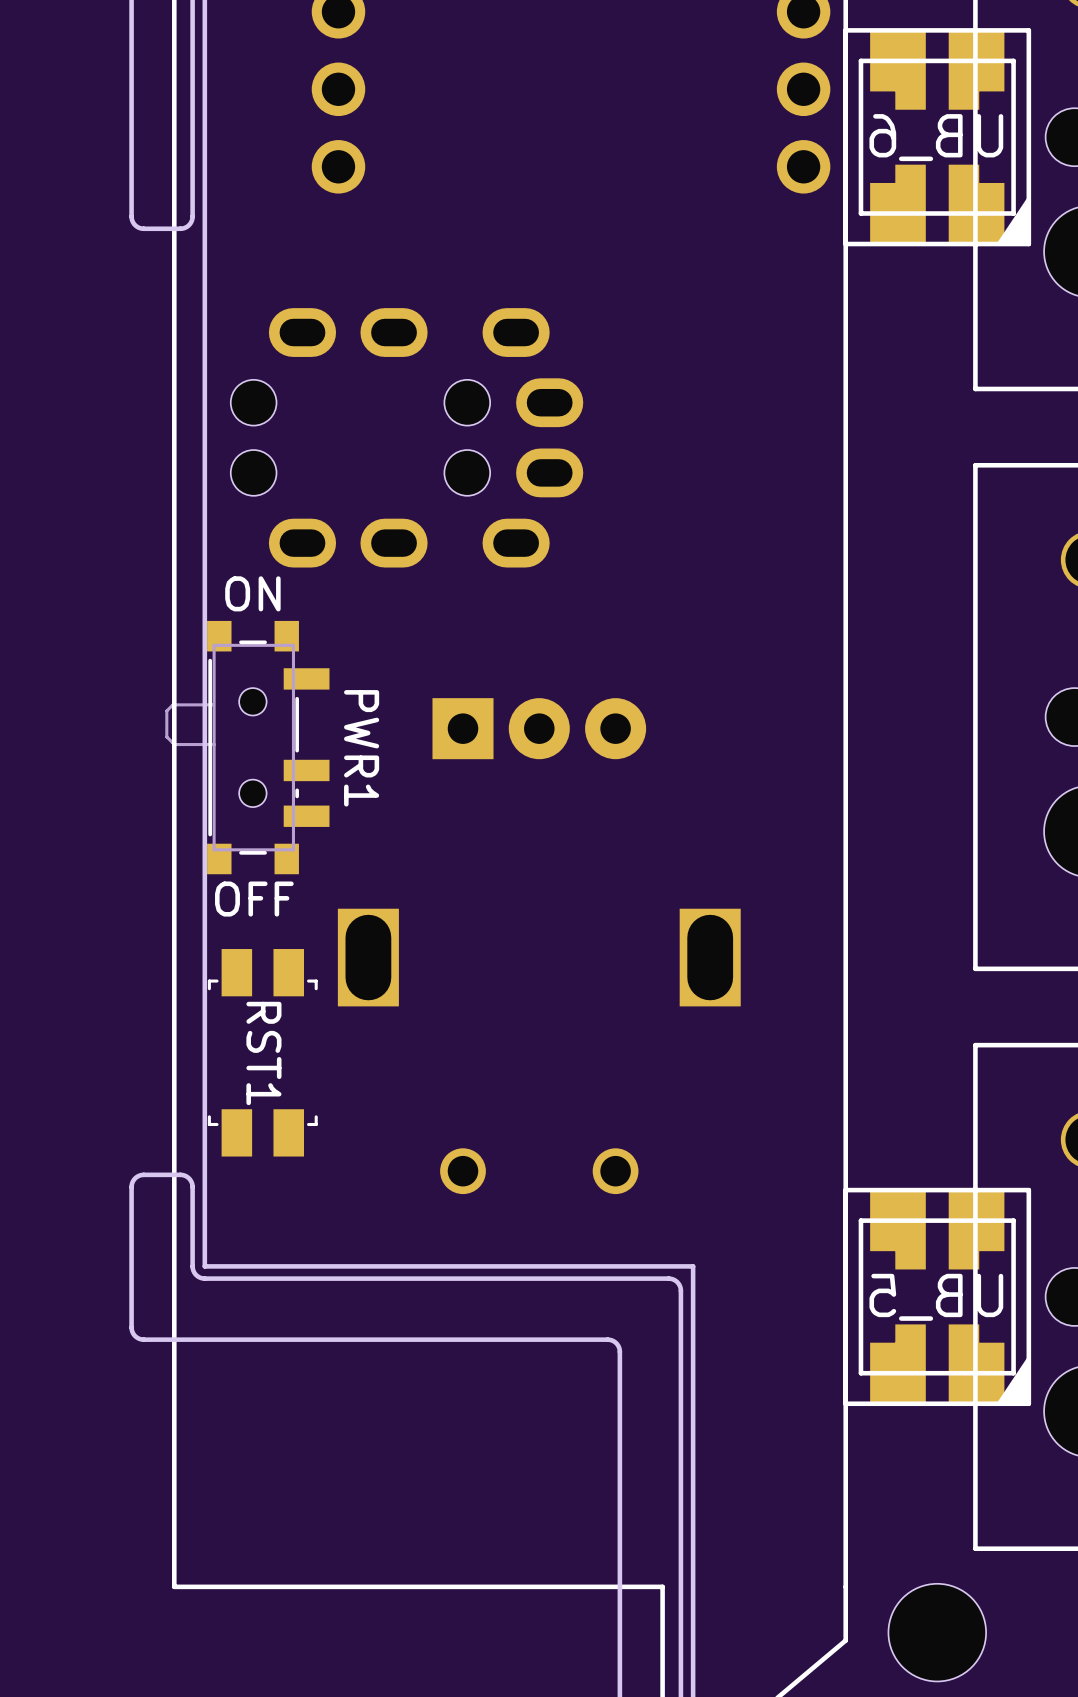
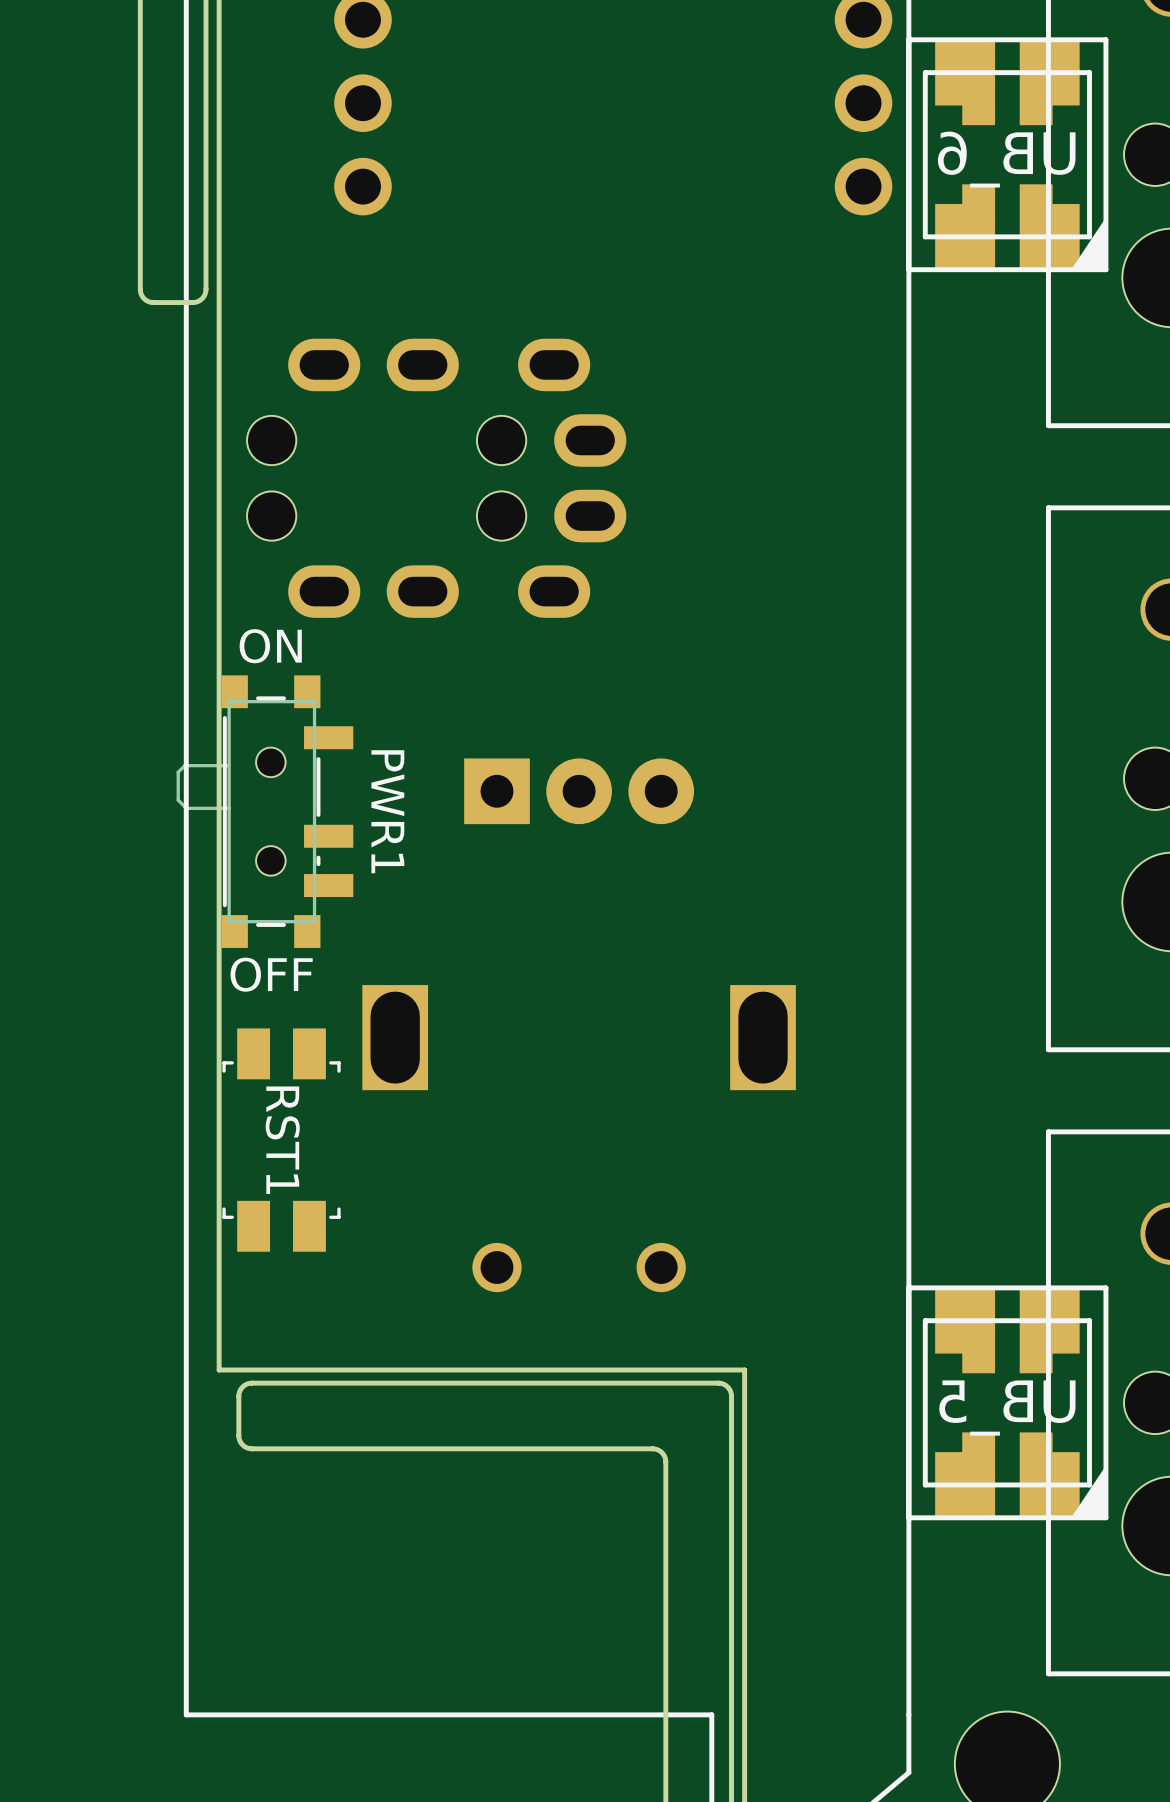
board edge: (192, 216) (189, 225) (180, 228) (140, 228) (134, 223) (131, 216) -> (205, 240) (205, 292) (200, 299) (192, 302) (151, 302) (143, 297) (140, 289) (140, 240)
board edge: (235, 1278) (203, 1278) (197, 1276) (193, 1271) (192, 1187) (189, 1178) (181, 1174) (143, 1174) (135, 1178) (131, 1187) (131, 1327) (133, 1333) (137, 1338) (143, 1339) (235, 1339) -> (251, 1383) (242, 1386) (238, 1396) (239, 1439) (243, 1446) (251, 1448)

